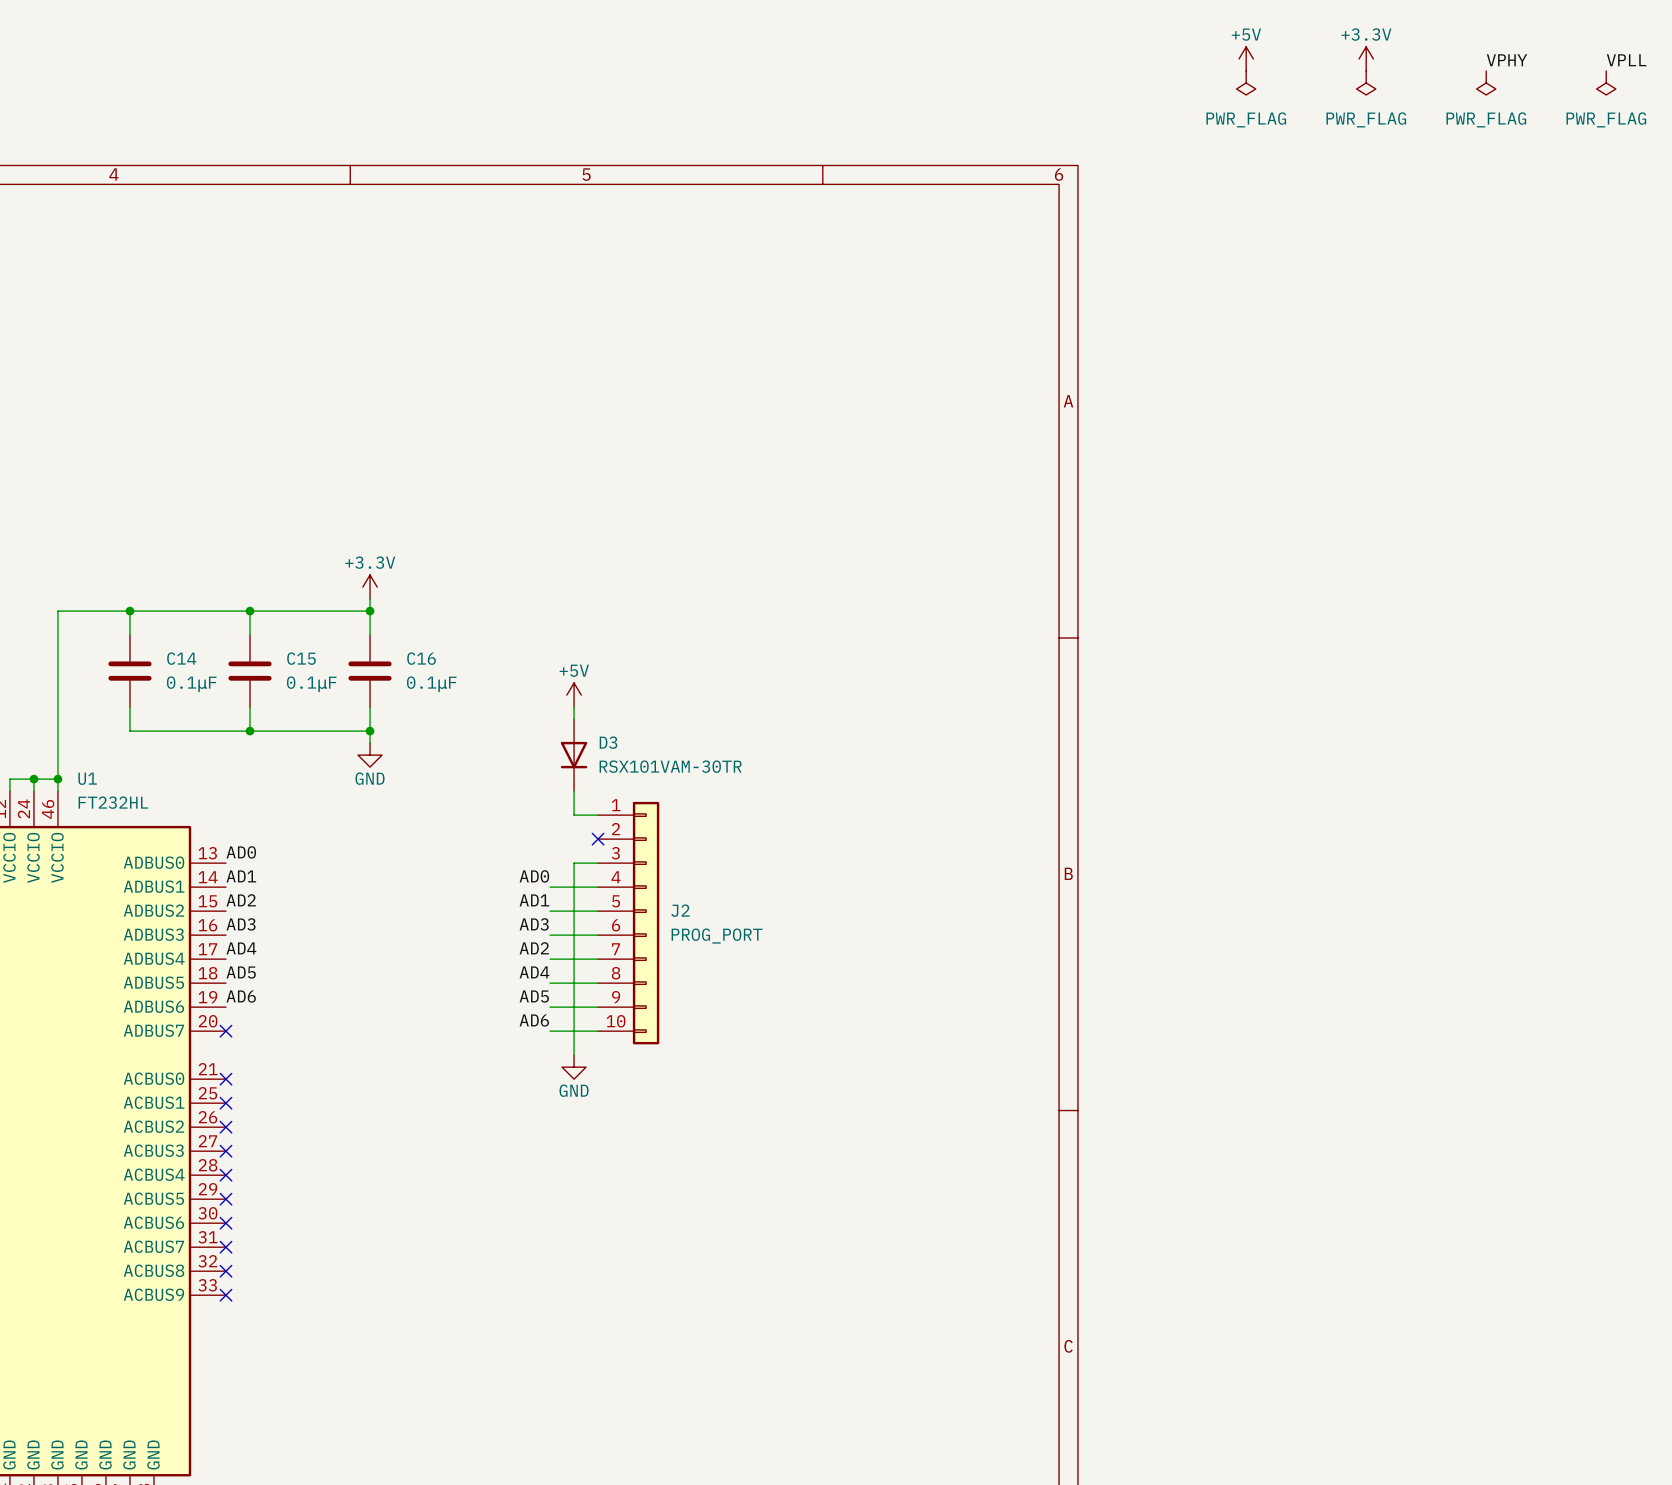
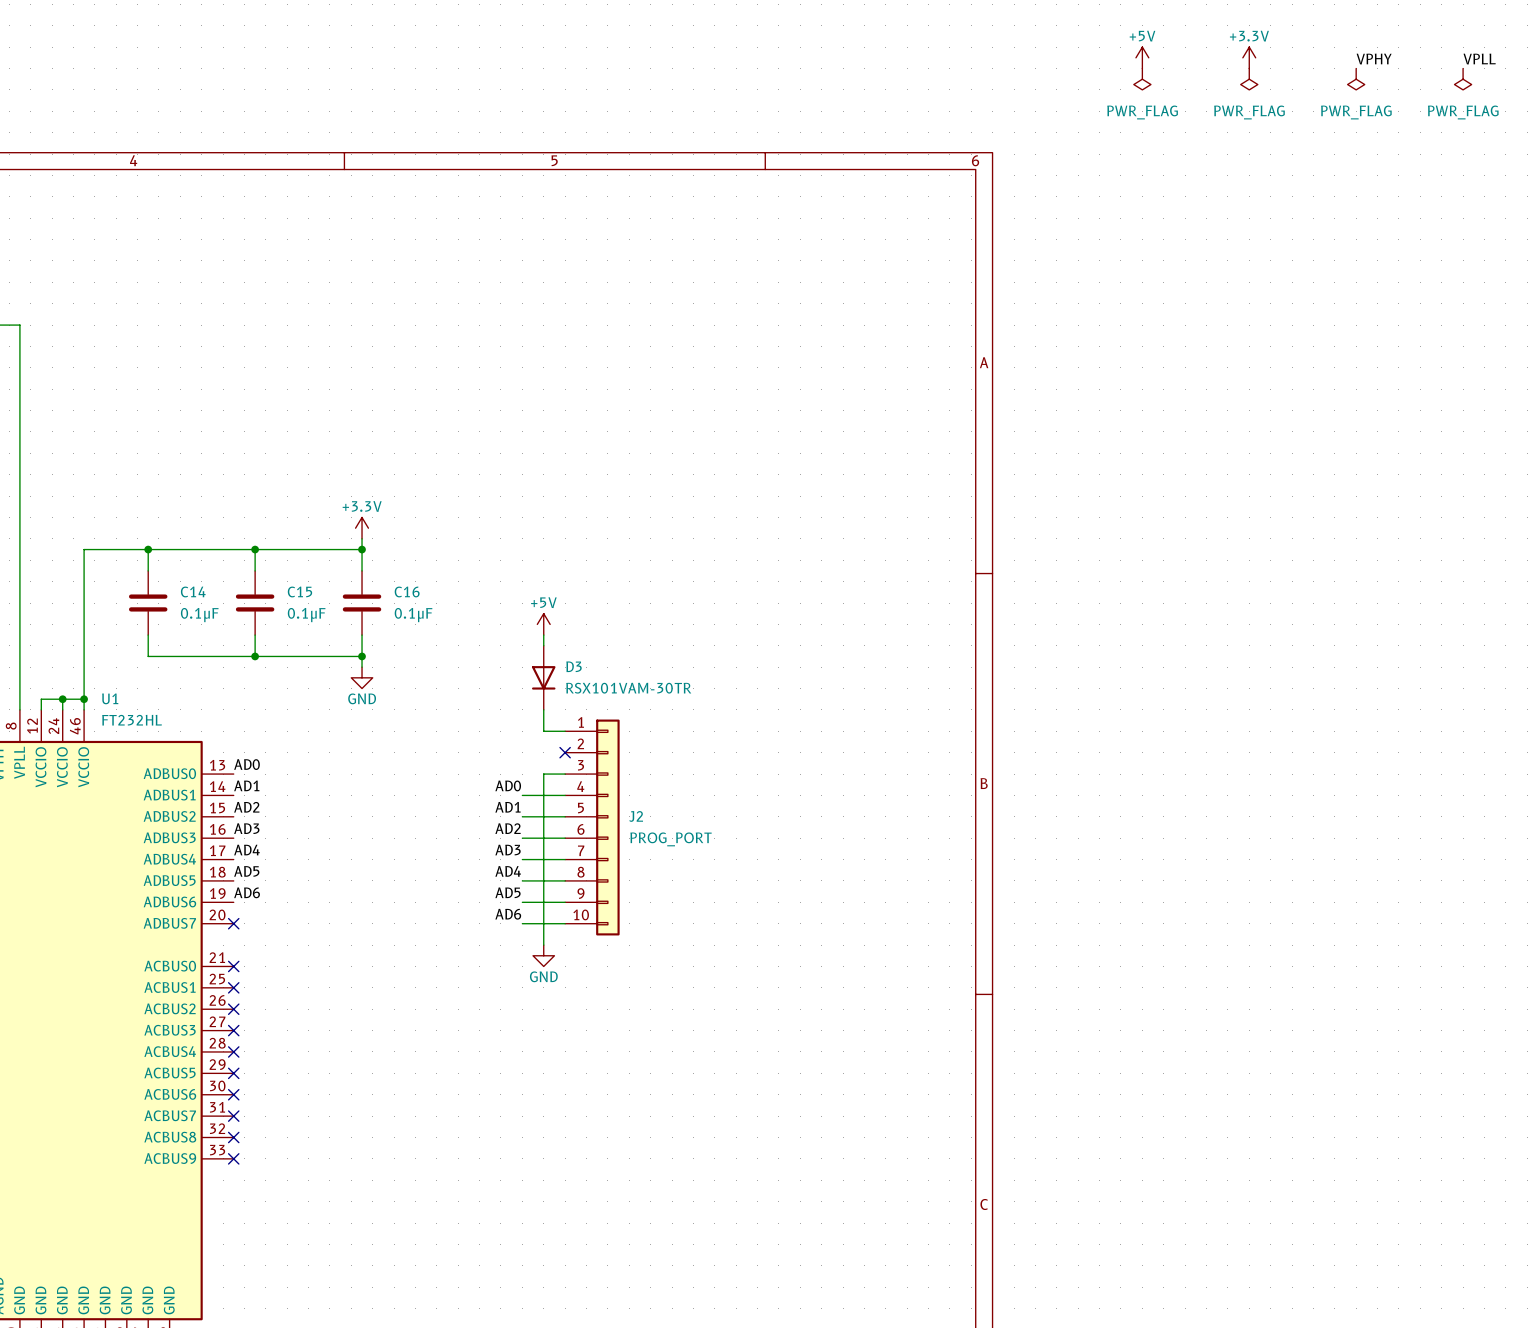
label: AD3 (534, 924) -> AD2 (508, 828)
label: AD2 (534, 948) -> AD3 (508, 850)

